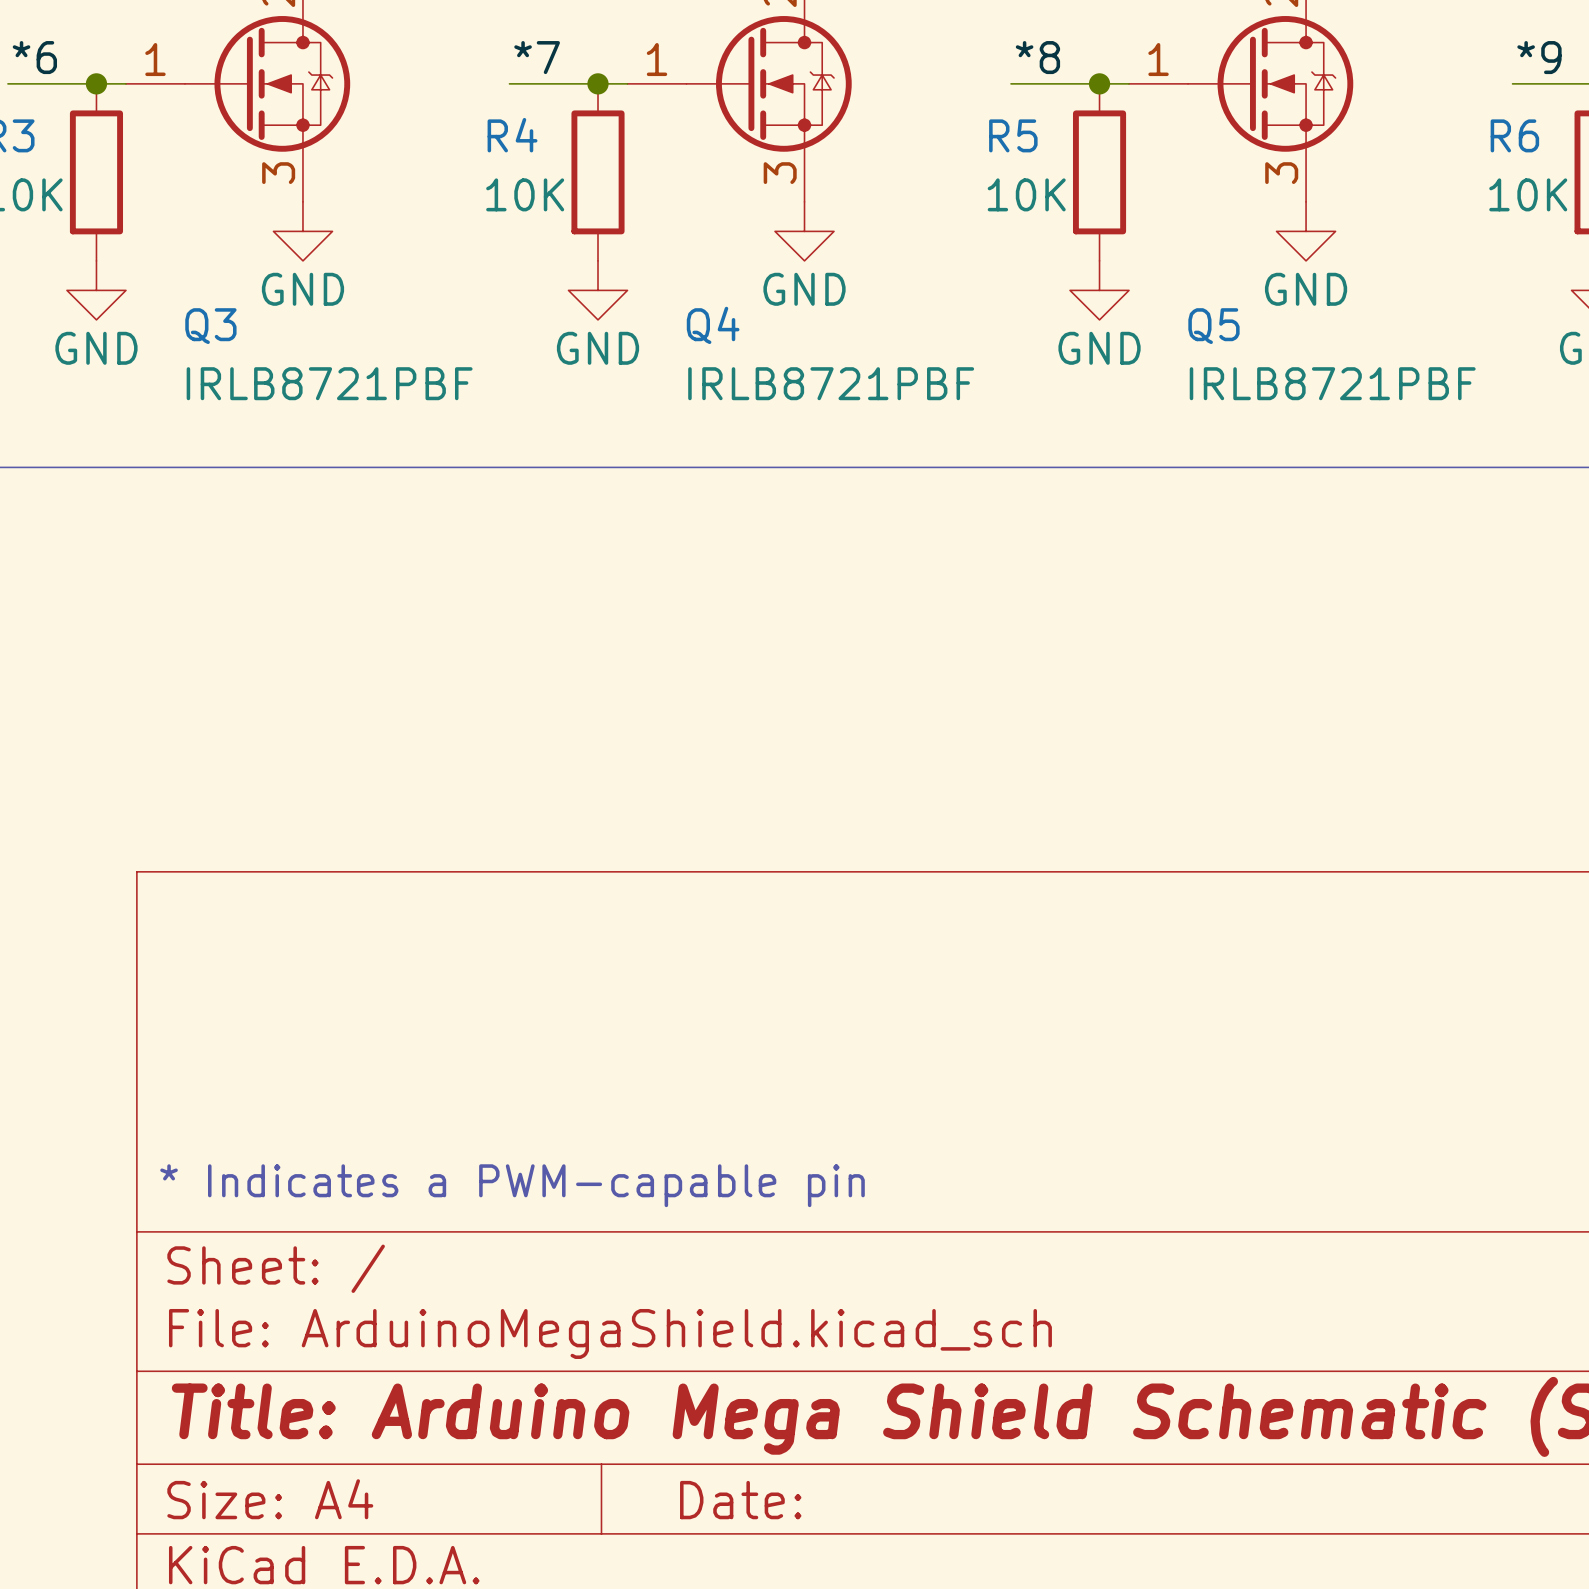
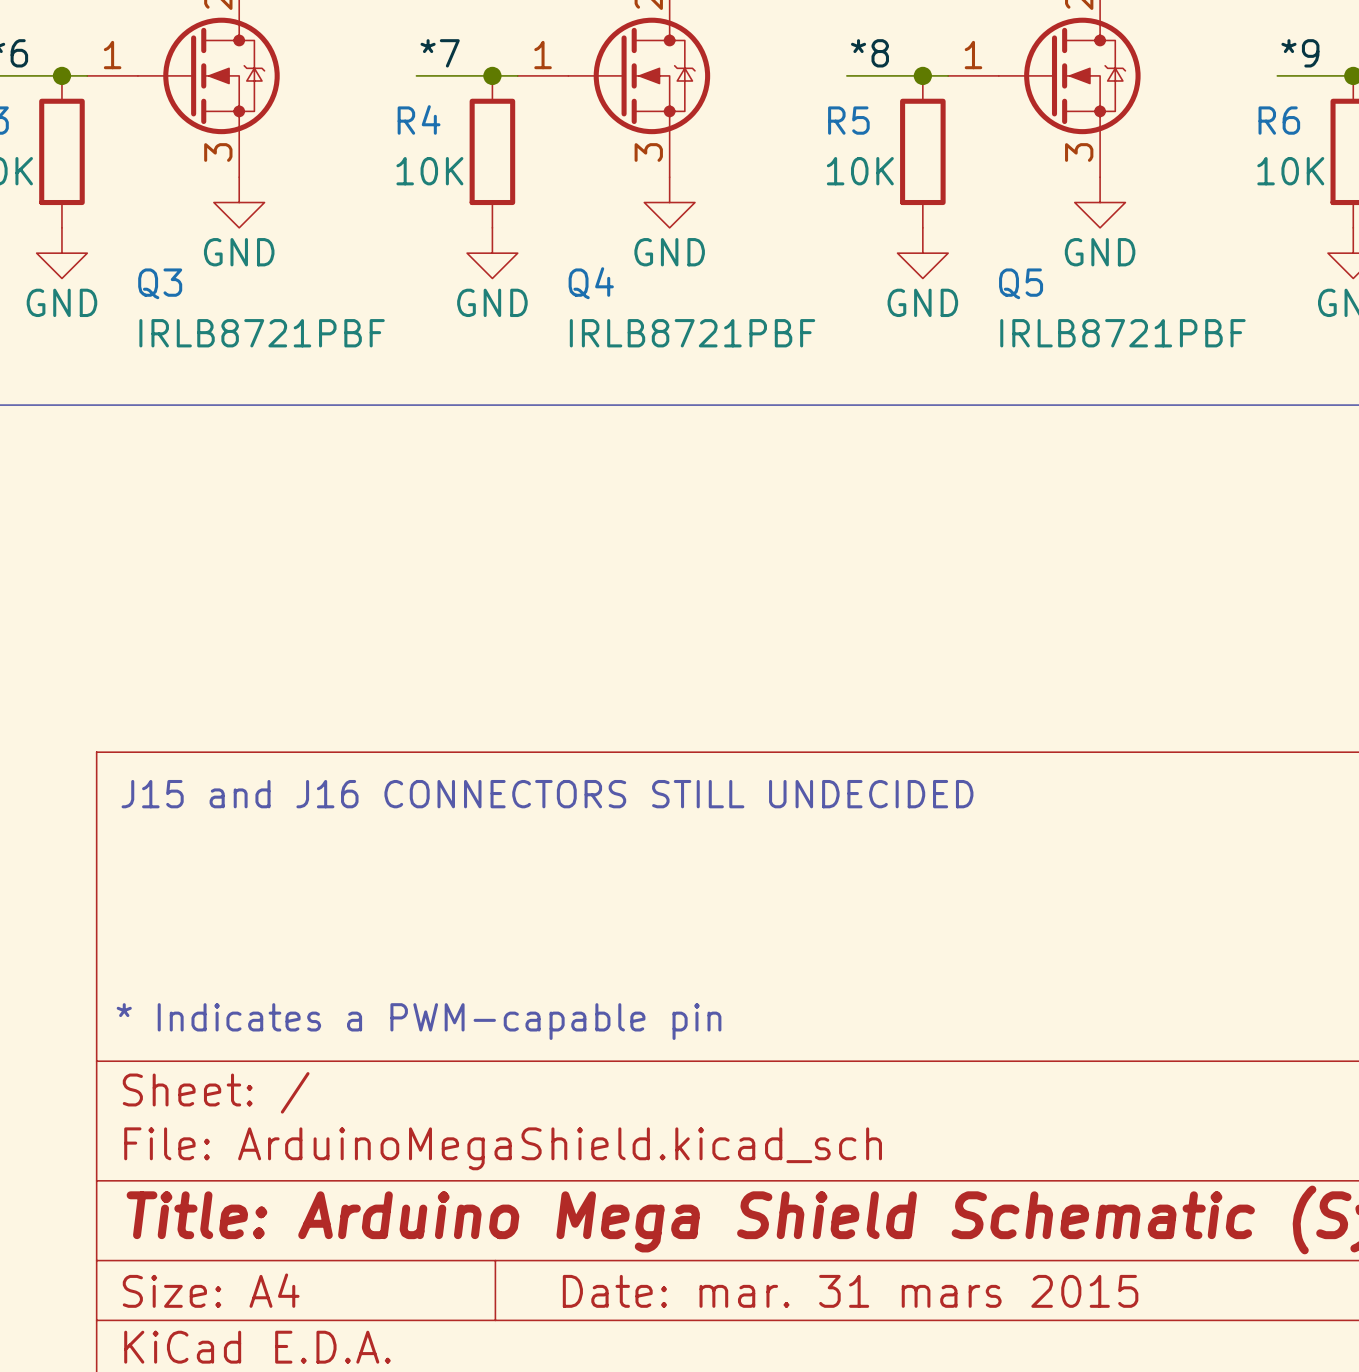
text: none -> J15 and J16 CONNECTORS STILL UNDECIDED (547, 794)
title block: Date: (740, 1500) -> Date: mar. 31 mars 2015 (850, 1291)

